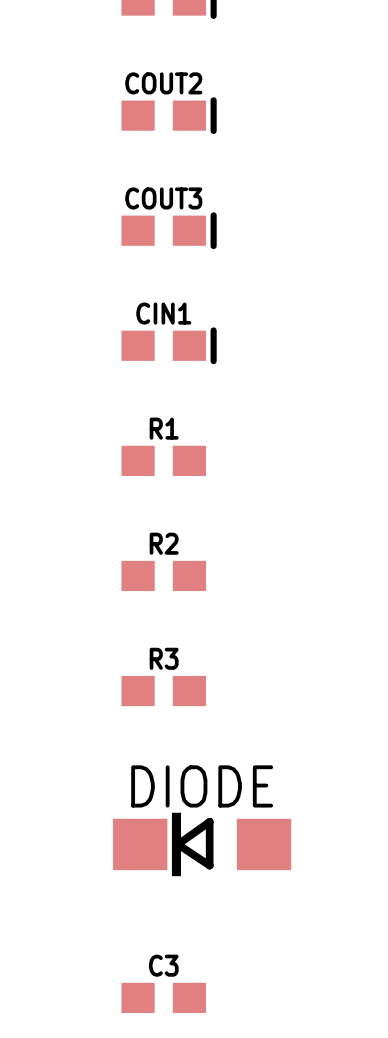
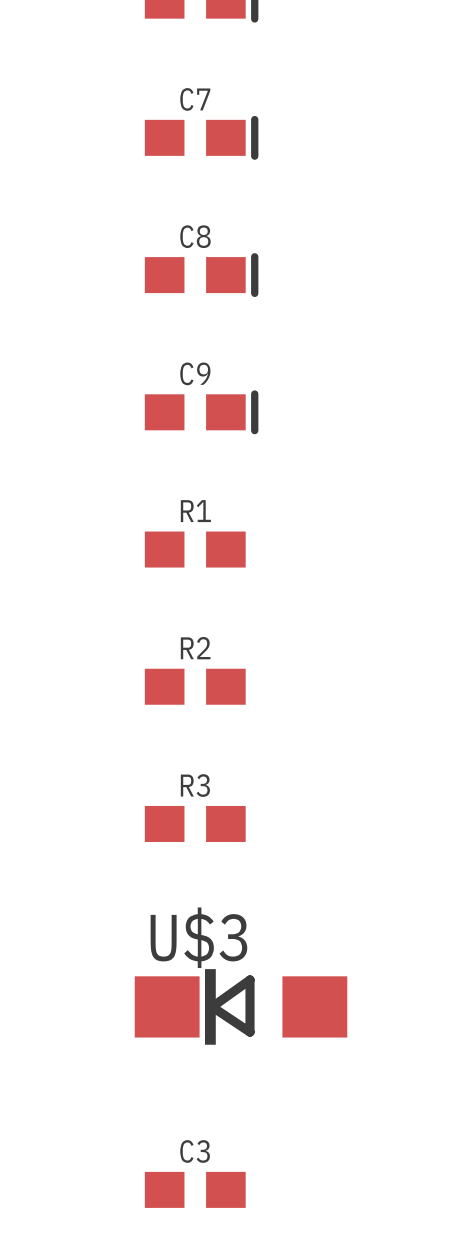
COUT2 name: COUT2 (163, 83) -> C7 (195, 99)
COUT3 name: COUT3 (163, 198) -> C8 (195, 236)
CIN1 name: CIN1 (163, 313) -> C9 (195, 373)
DIODE name: DIODE (202, 786) -> U$3 (198, 937)

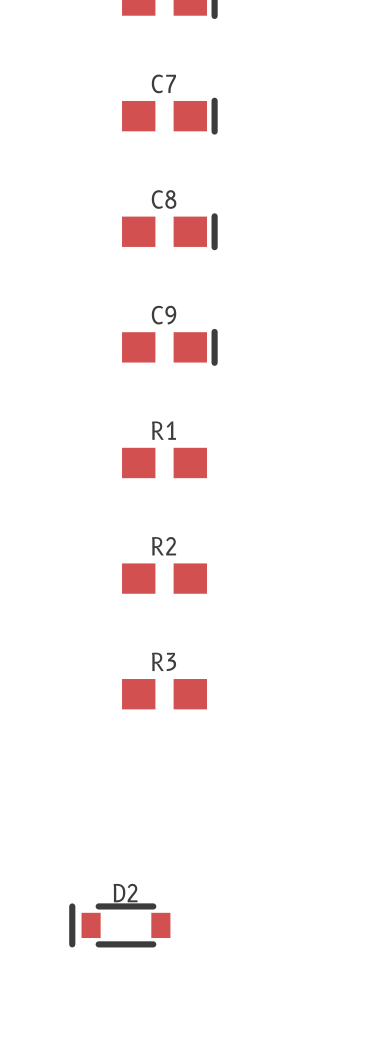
U$3: (241, 1006) -> none
D2: none -> (119, 925)
C3: (195, 1189) -> none

